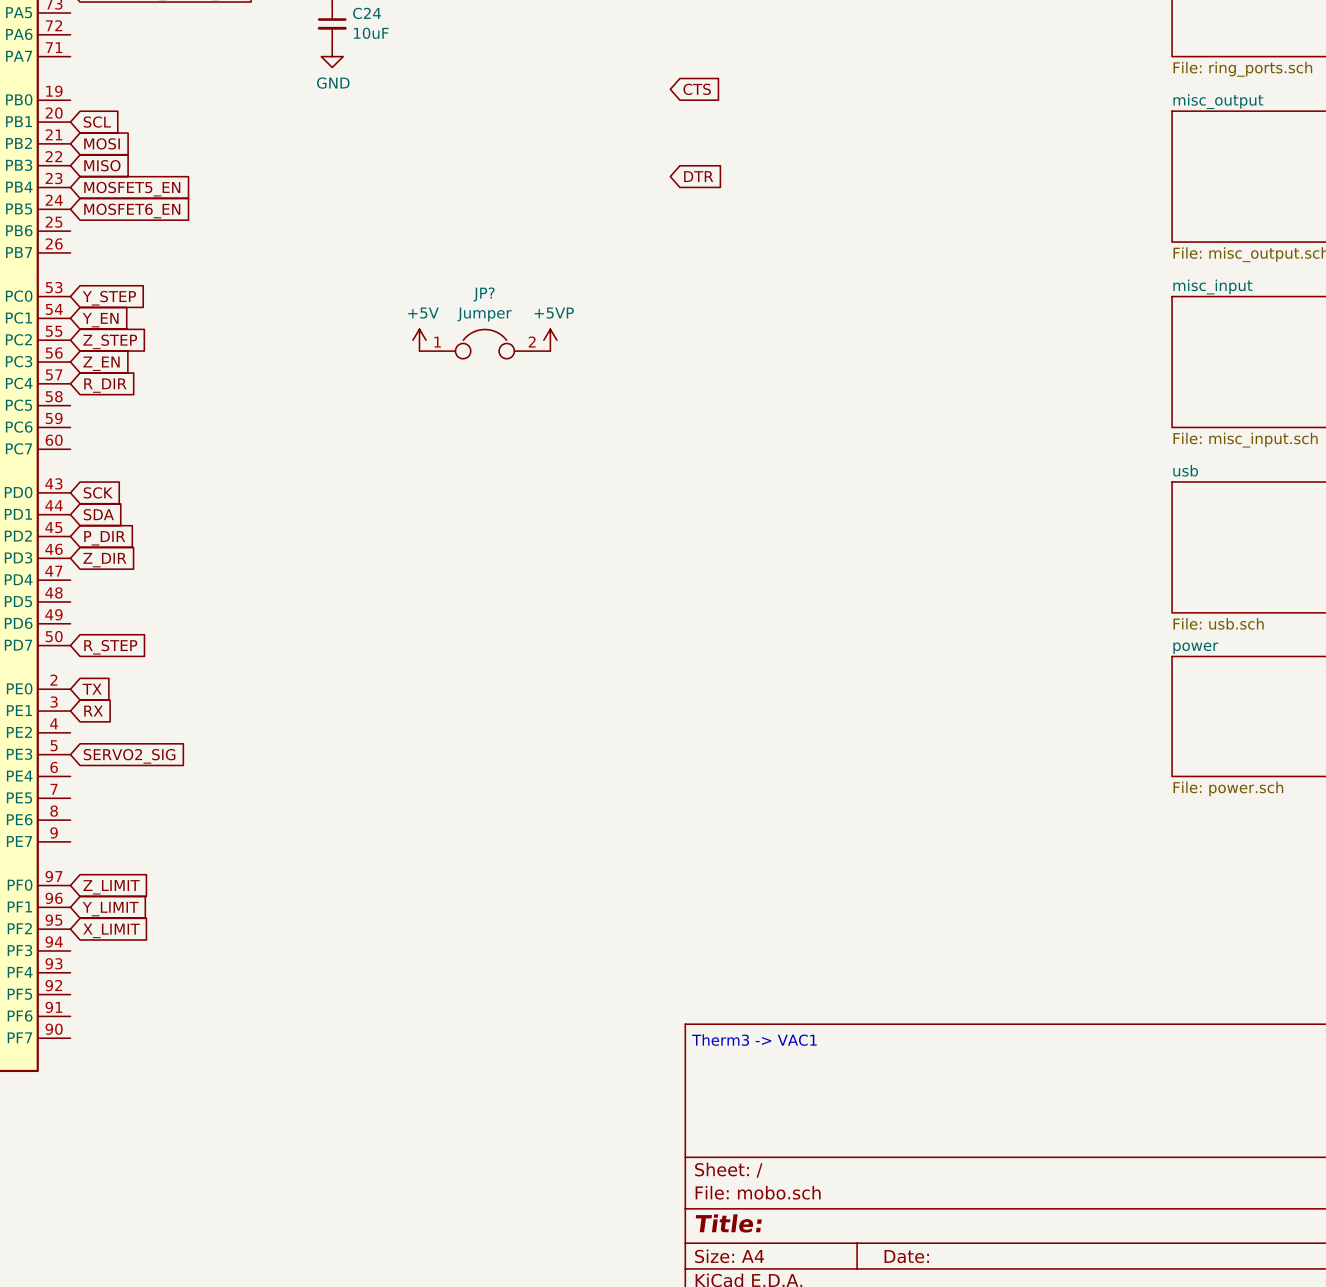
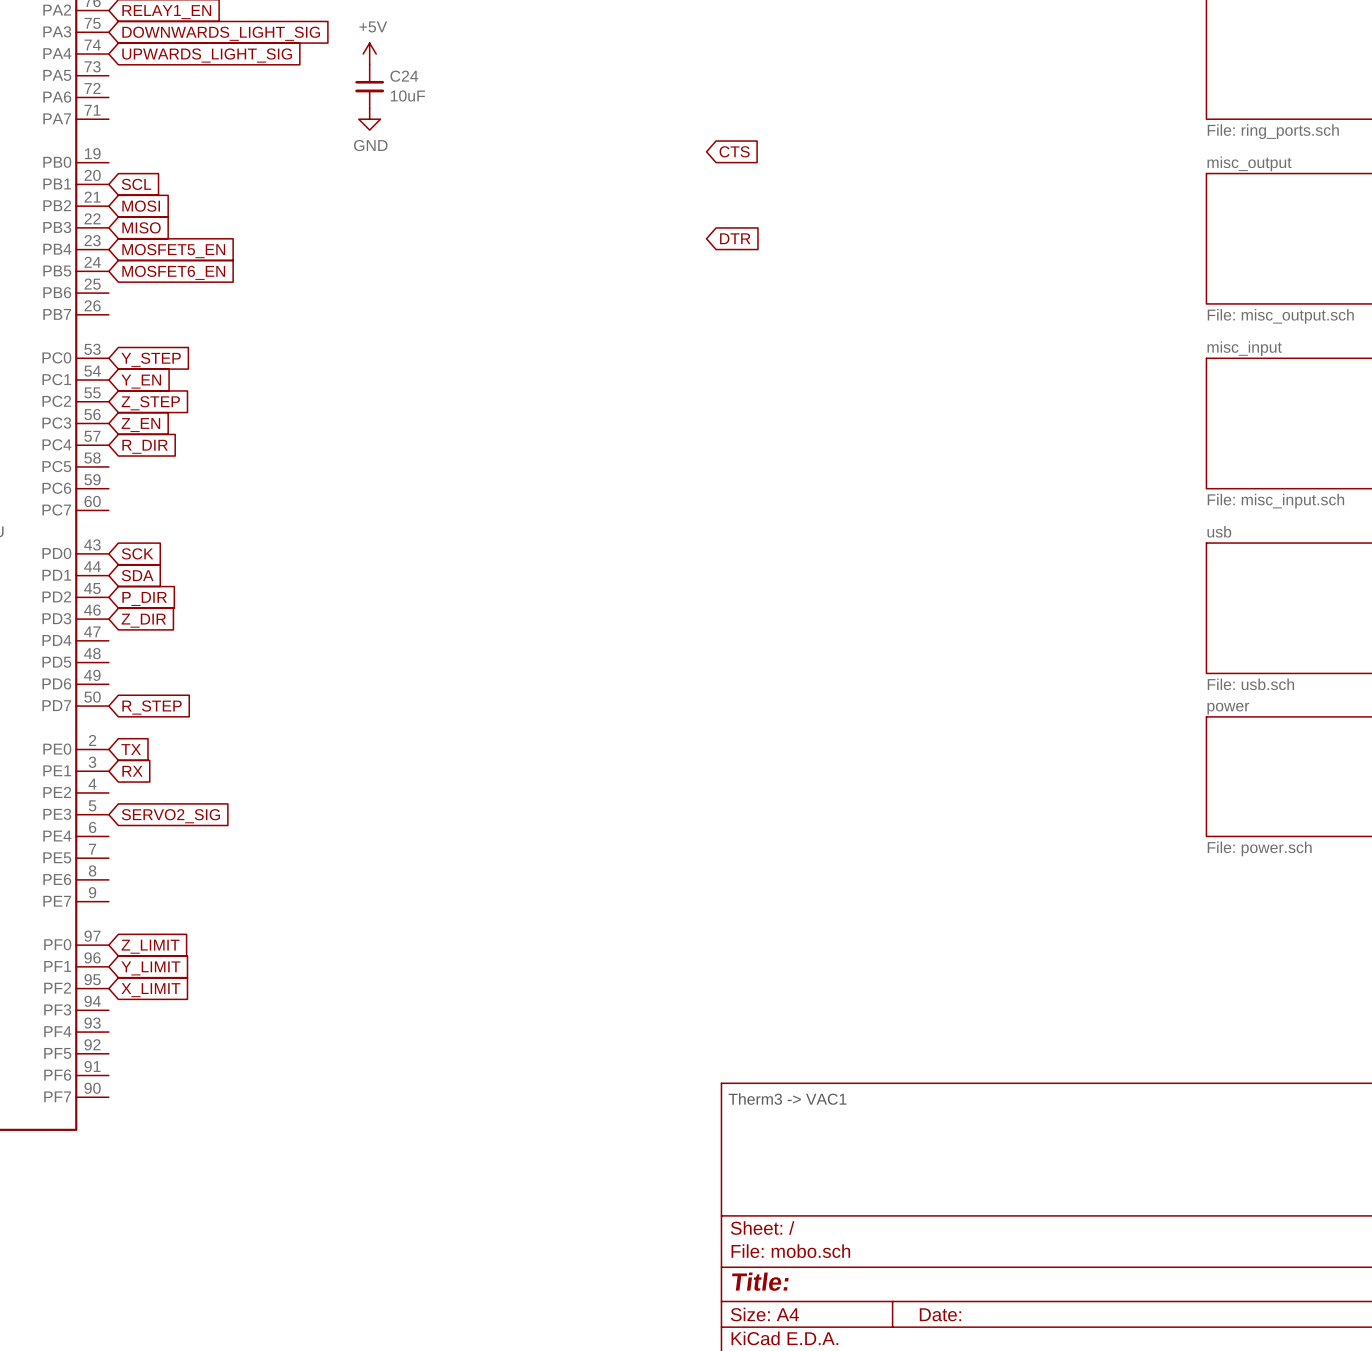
power symbol: +5V (419, 340) -> none
power symbol: +5VP (550, 340) -> none
JP?: Jumper (484, 344) -> none

